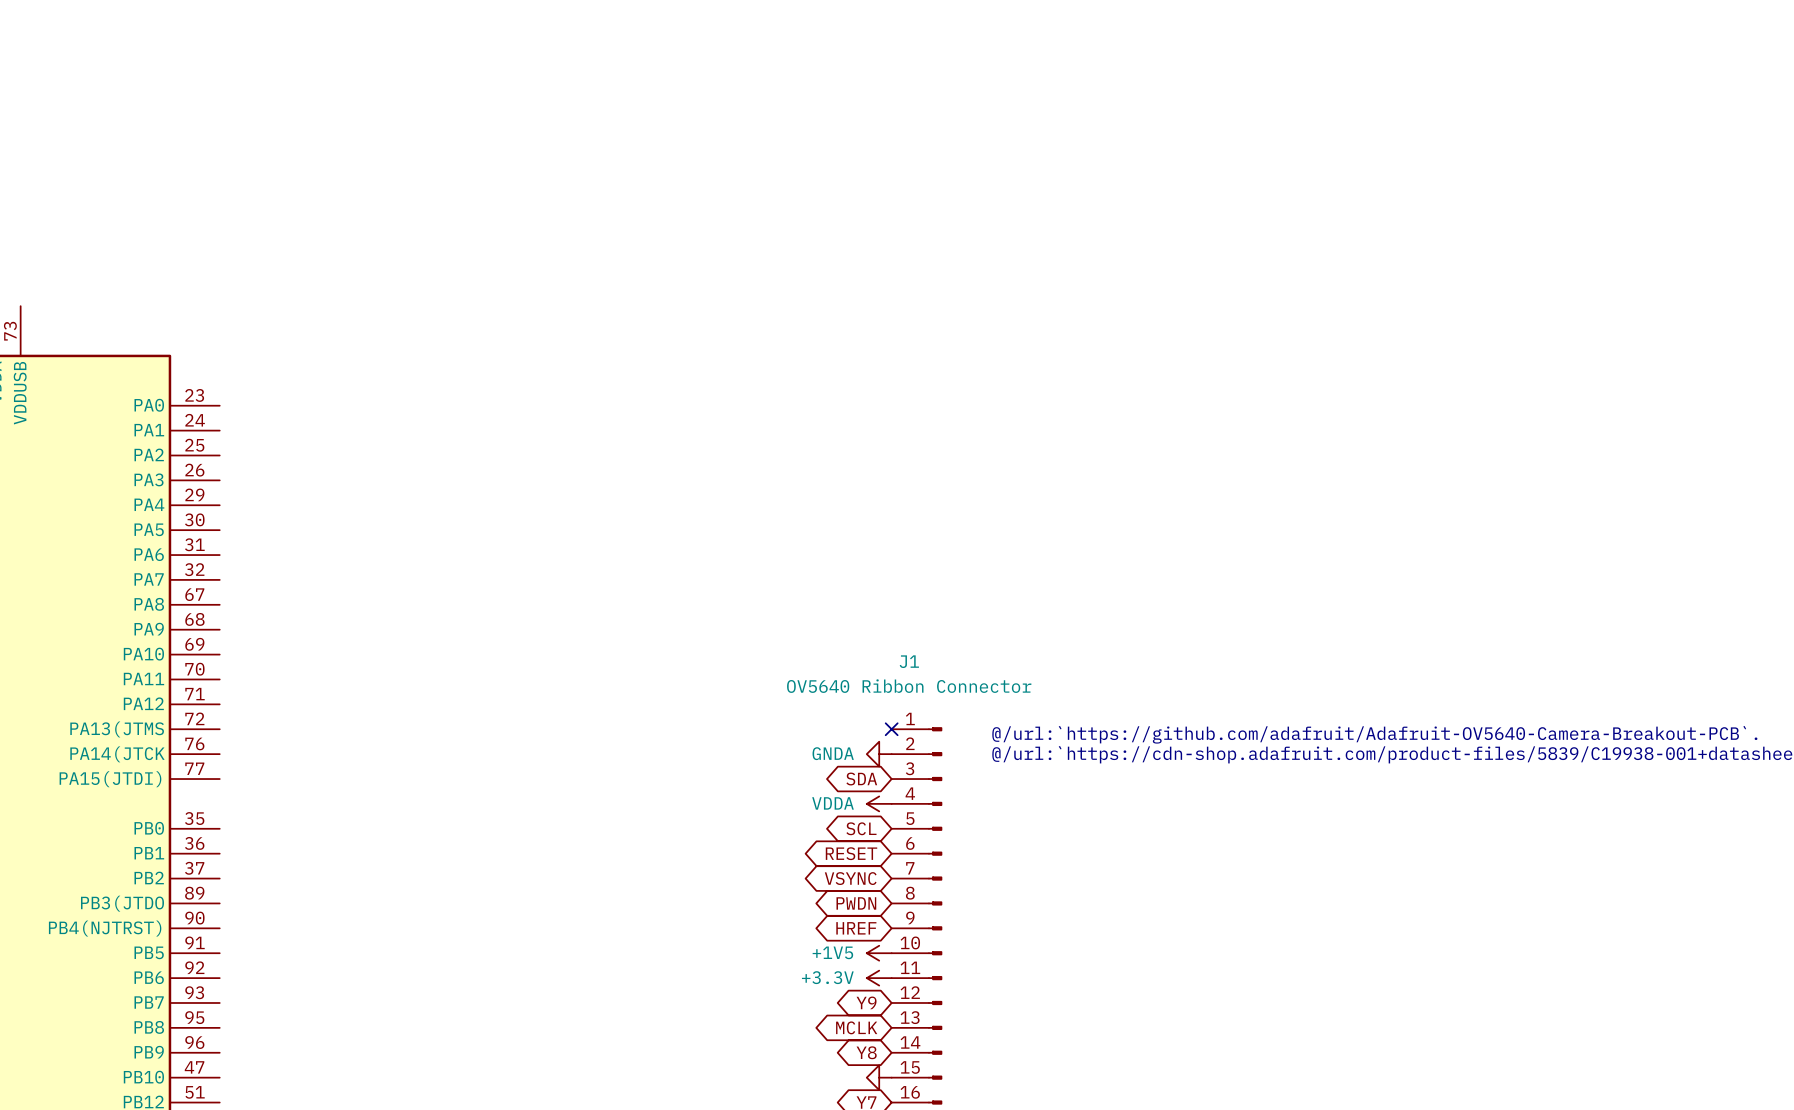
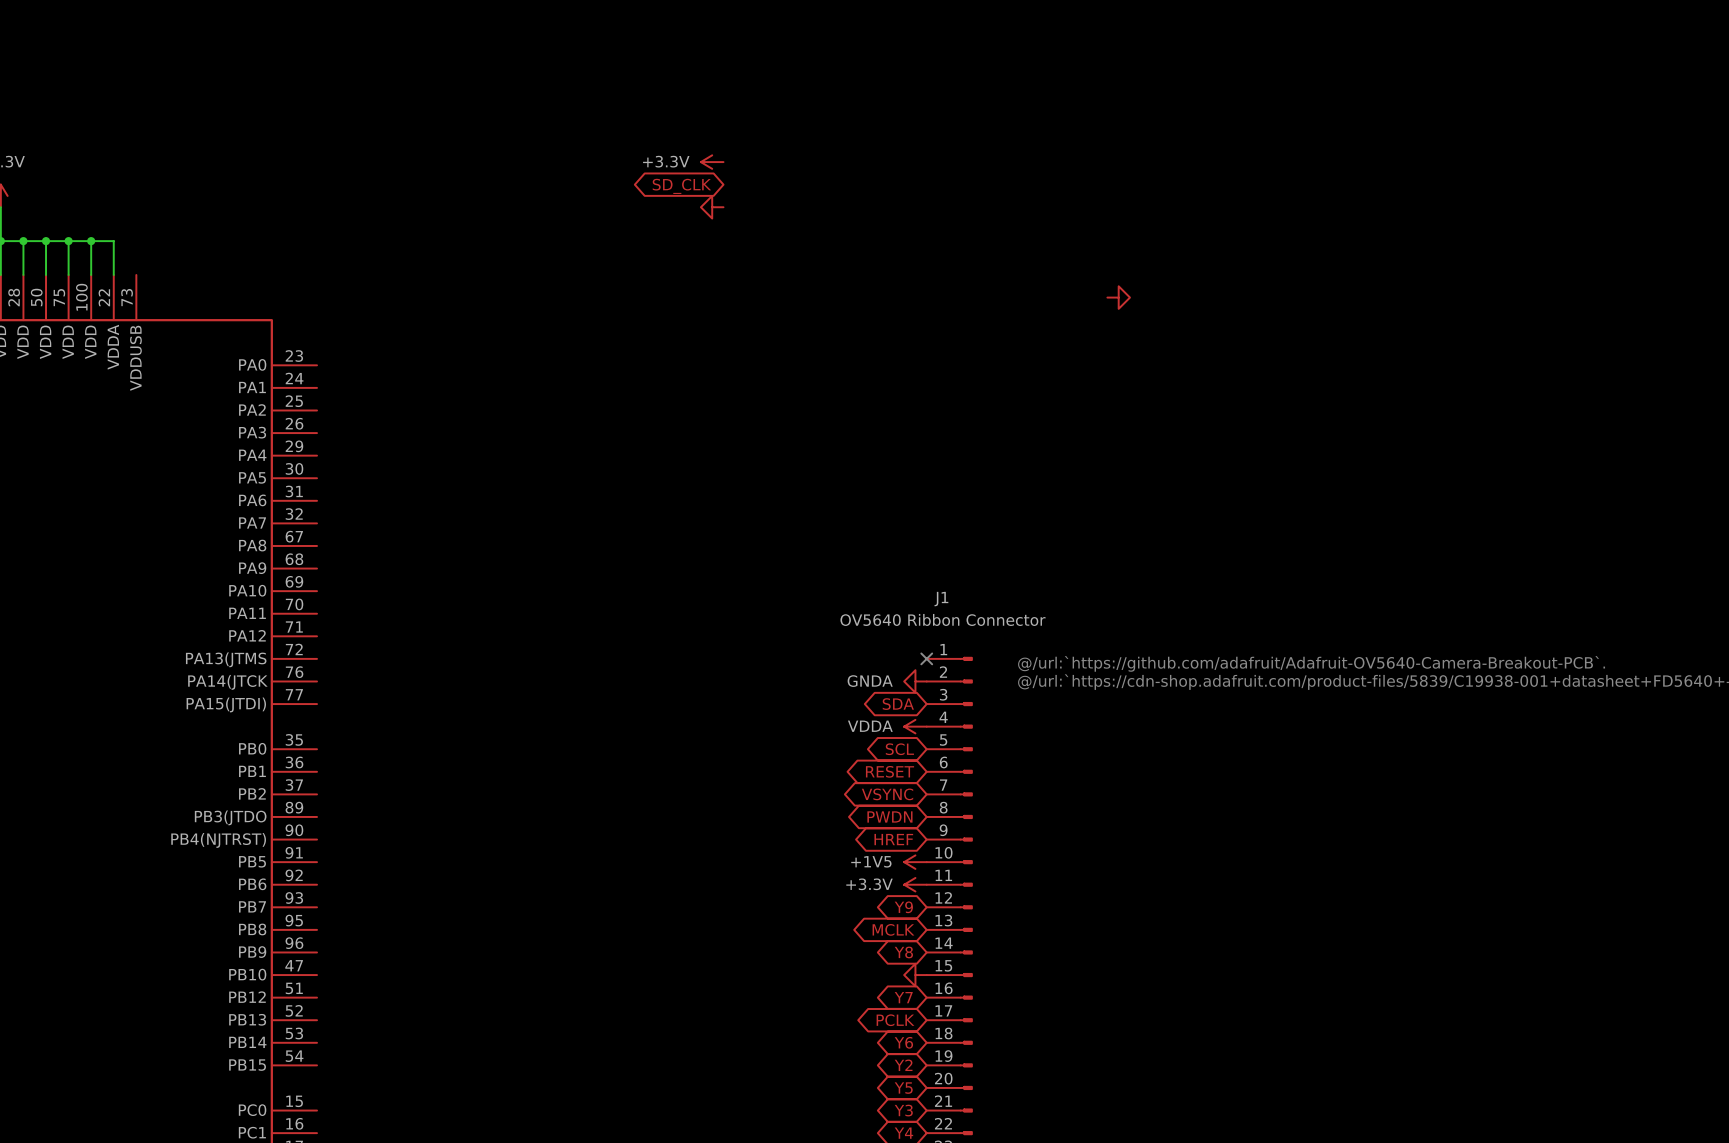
power symbol: none -> +3.3V (712, 162)
global label: none -> SD_CLK (681, 186)
power symbol: none -> (712, 207)
power symbol: none -> (1118, 297)

